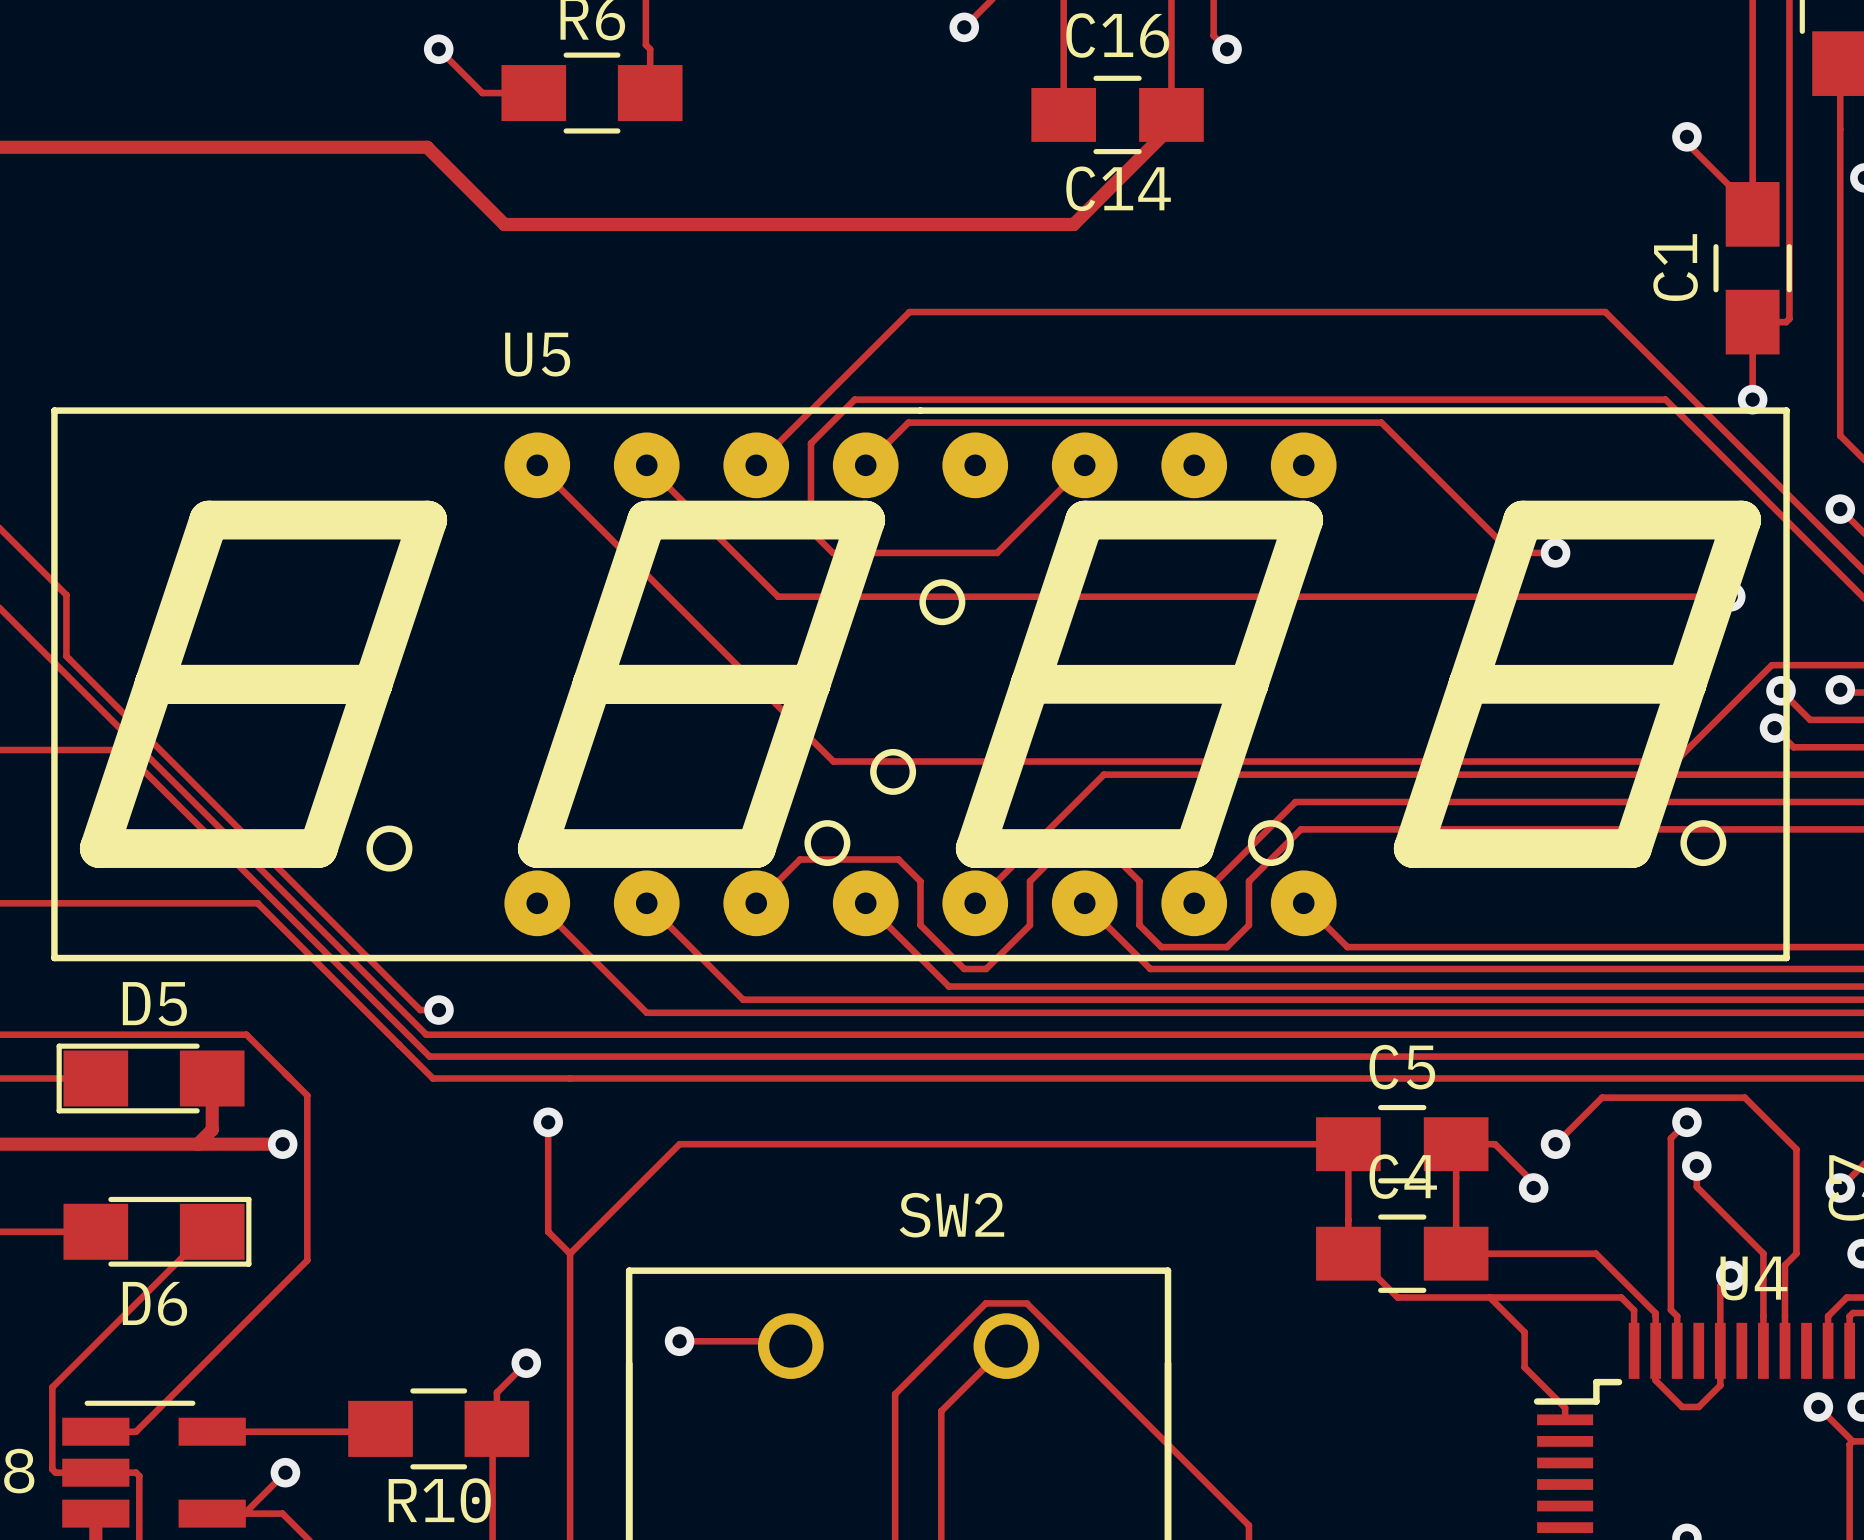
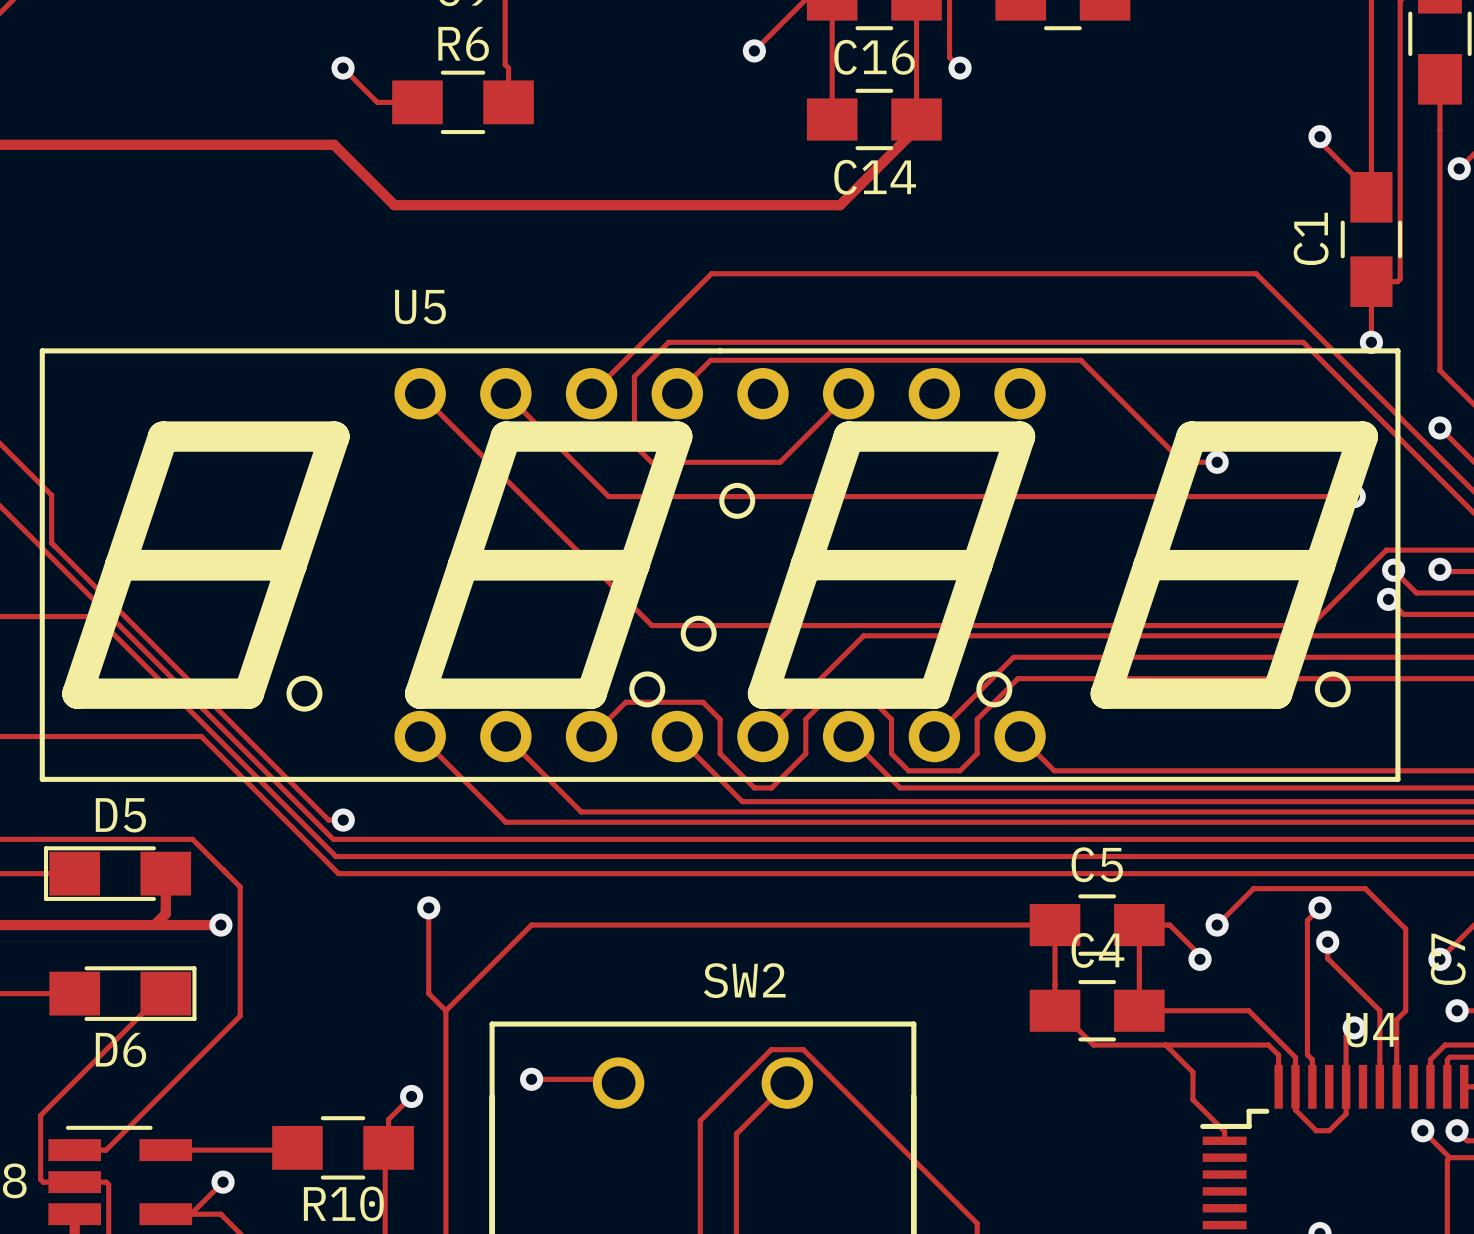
U5 footprint: [51, 407, 1790, 962] -> [39, 348, 1401, 782]

